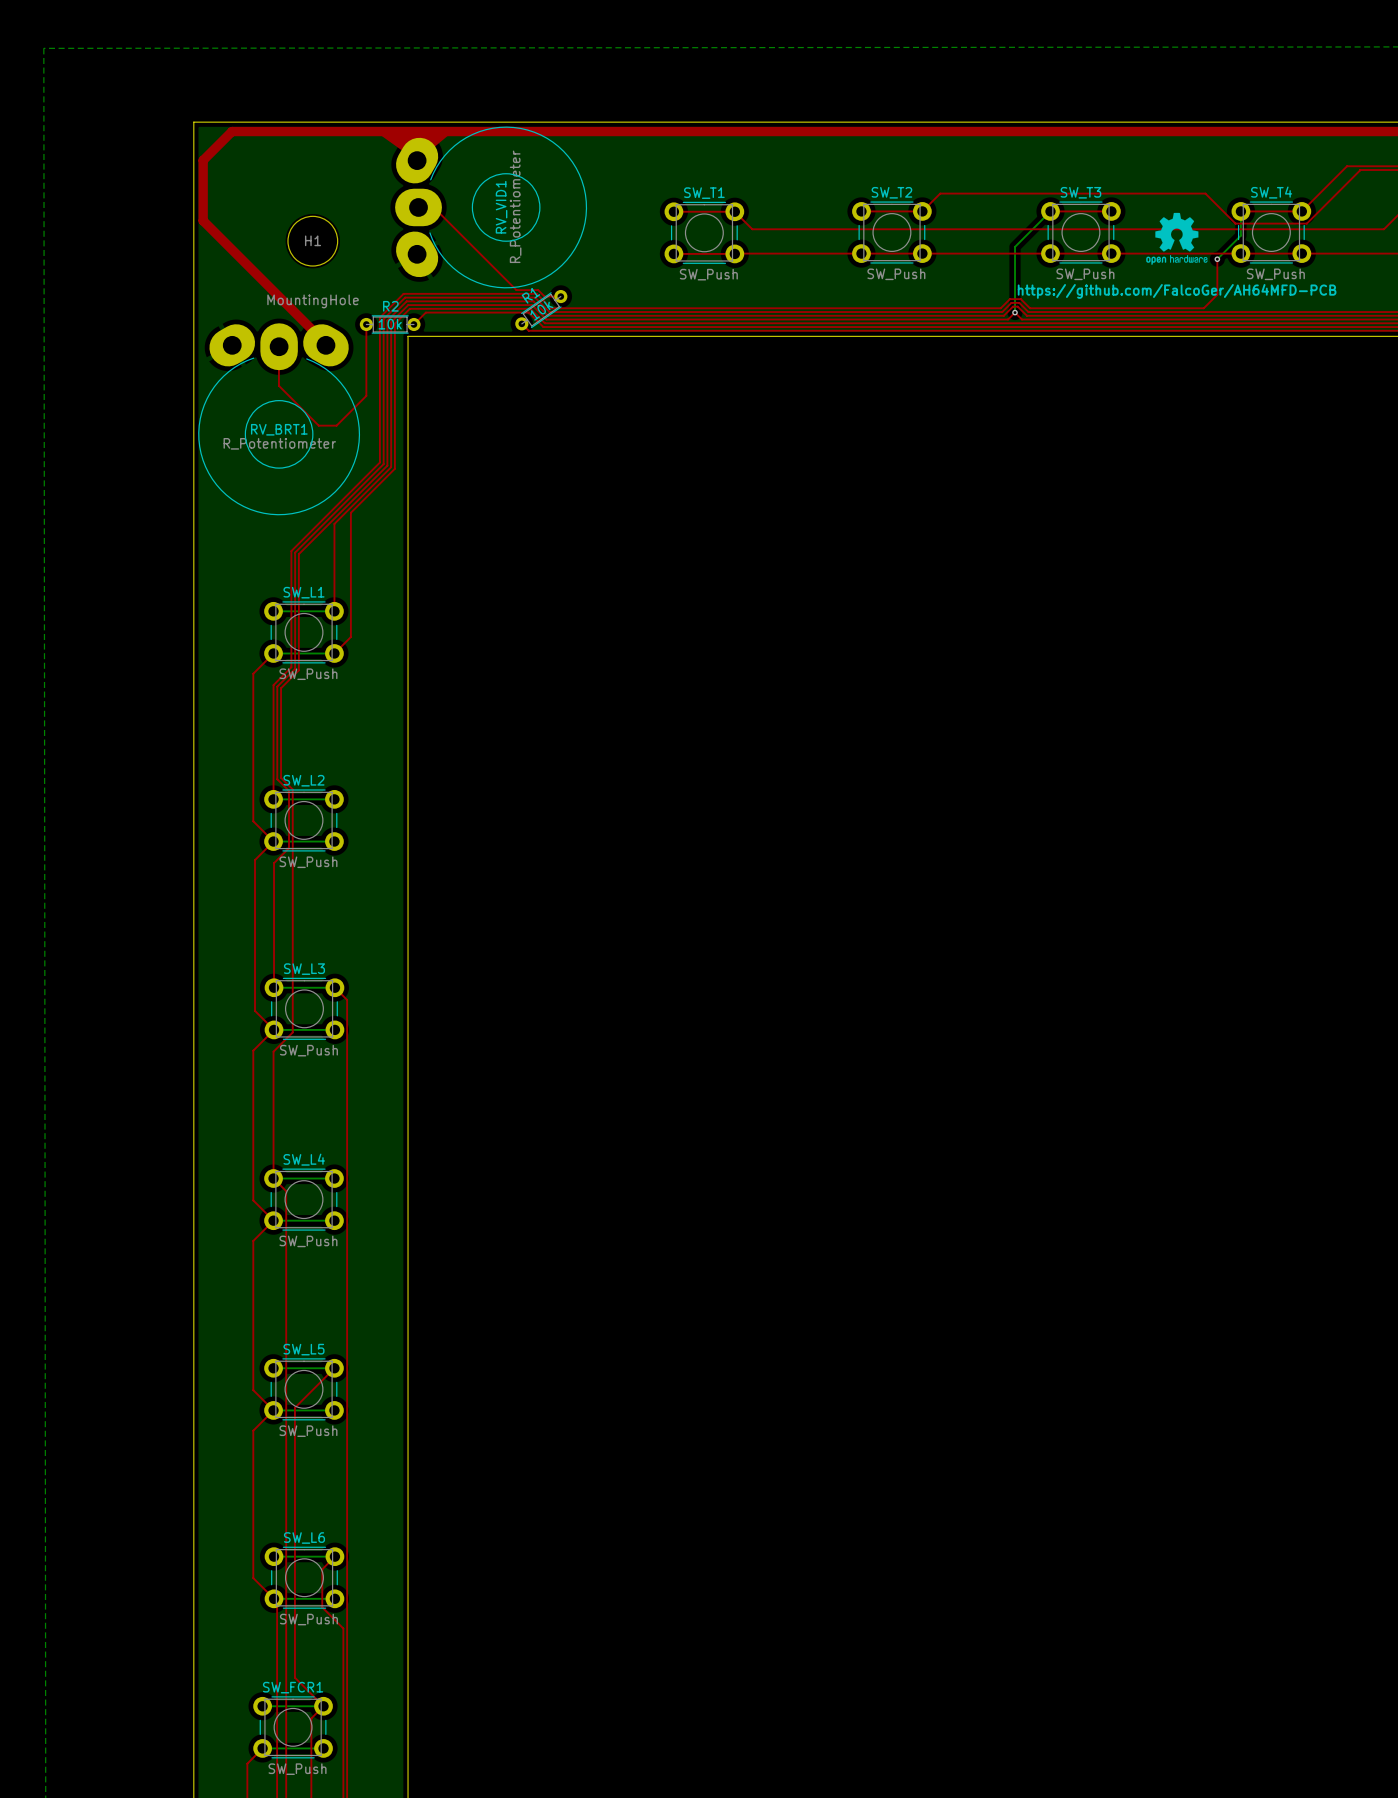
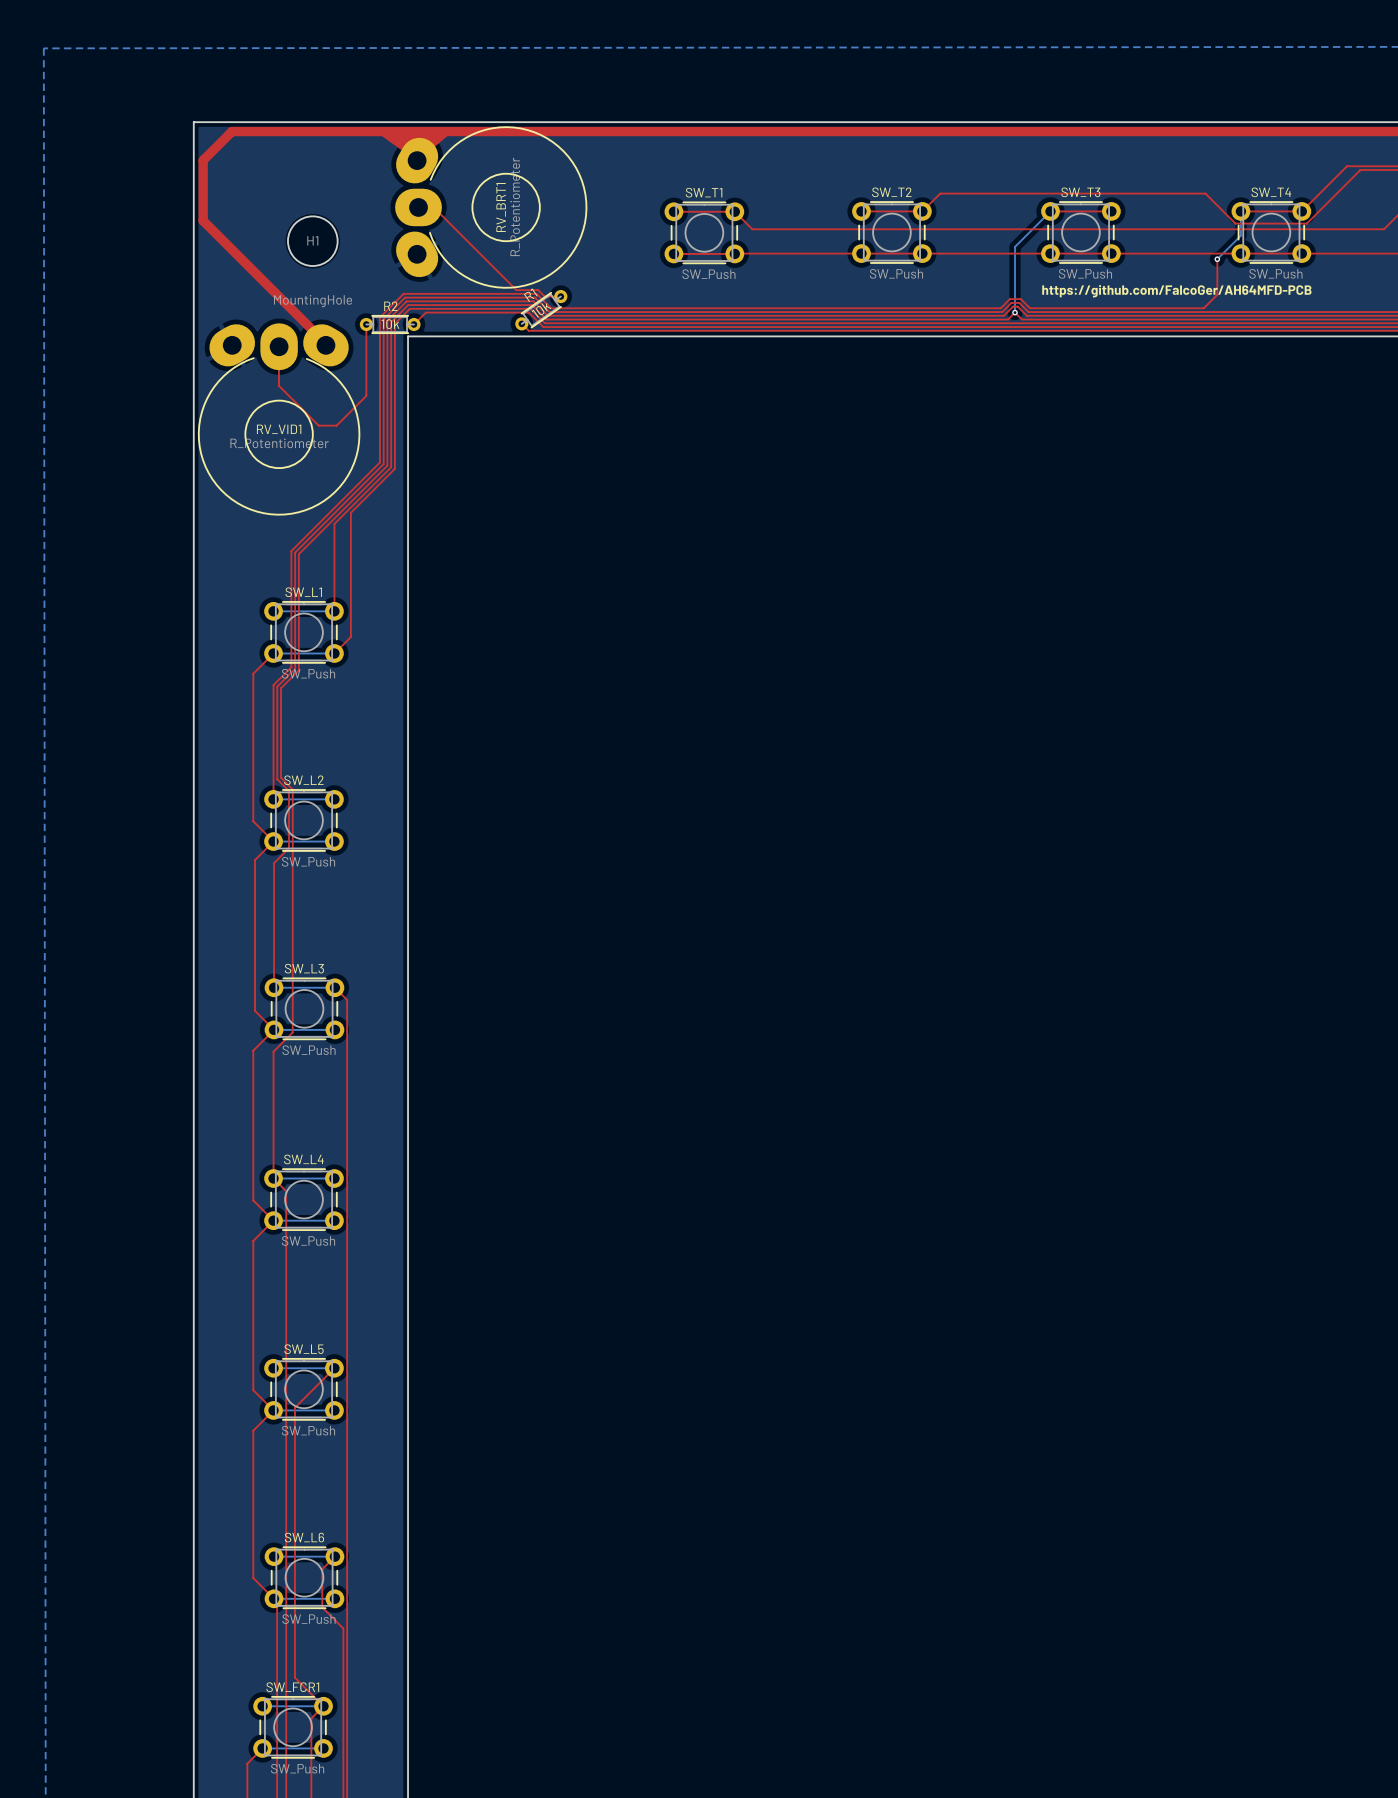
RV_VID1 name: RV_VID1 (501, 207) -> RV_BRT1 (501, 207)
drawing: [1146, 212, 1208, 265] -> none
RV_BRT1 name: RV_BRT1 (279, 429) -> RV_VID1 (279, 429)

